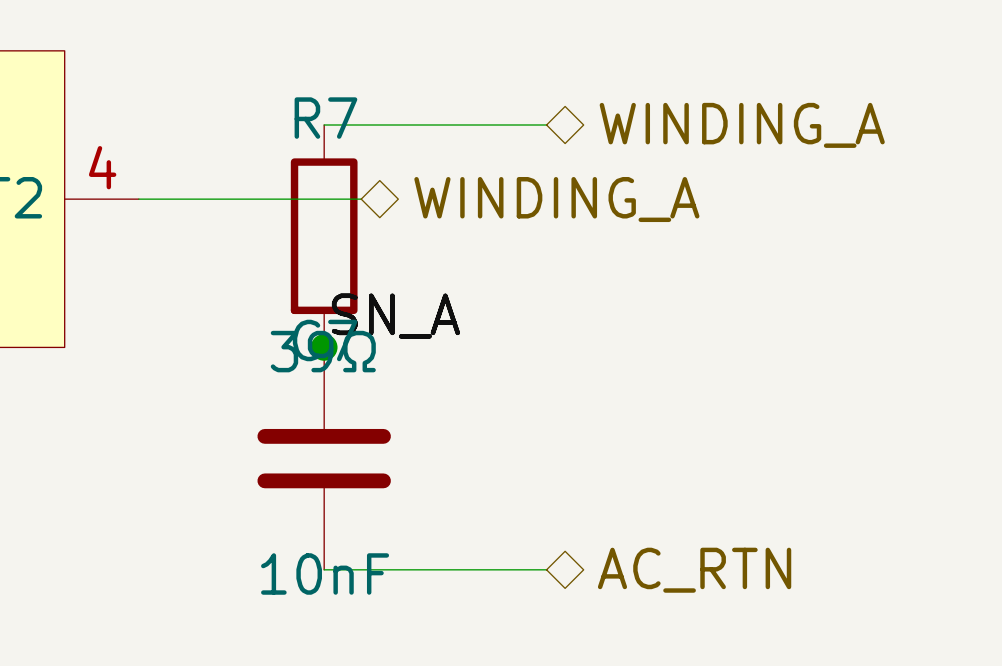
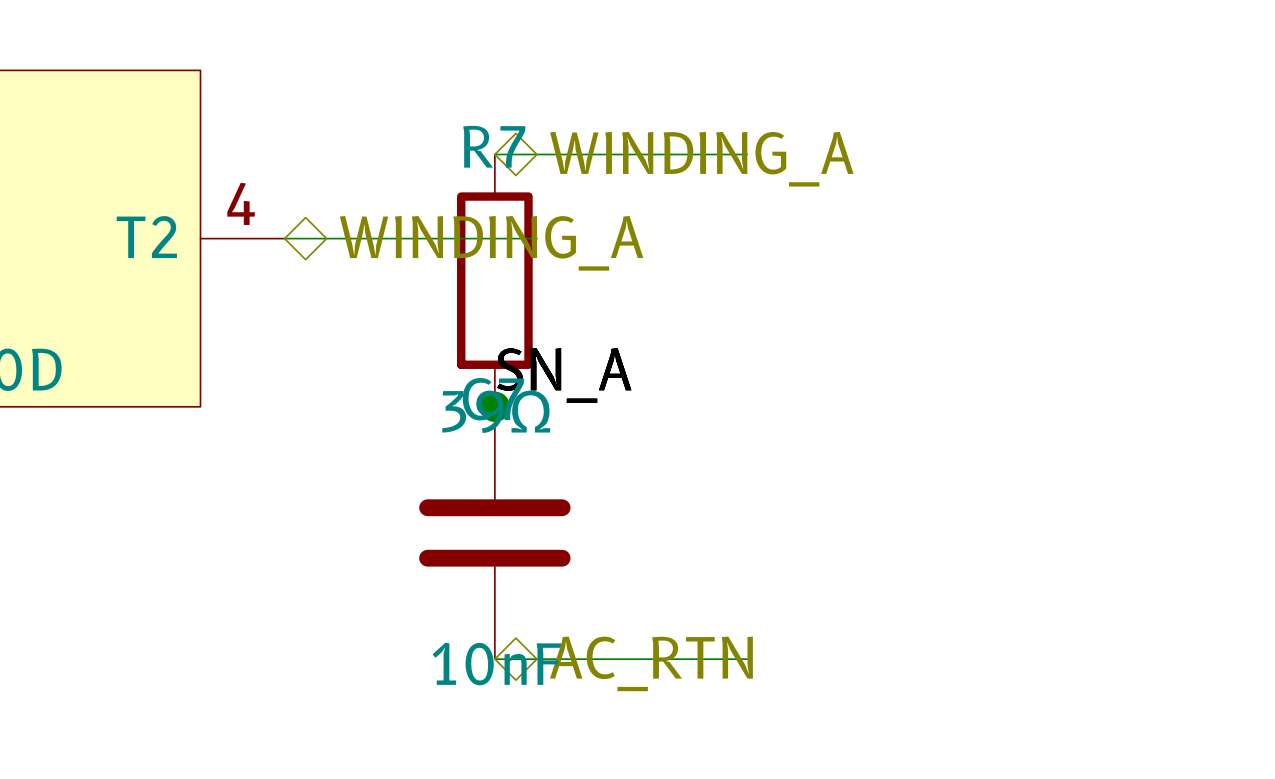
hierarchical label: WINDING_A (742, 125) -> none
hierarchical label: none -> WINDING_A (491, 243)
hierarchical label position: WINDING_A (556, 199) -> WINDING_A (701, 159)
hierarchical label position: AC_RTN (694, 570) -> AC_RTN (651, 663)

